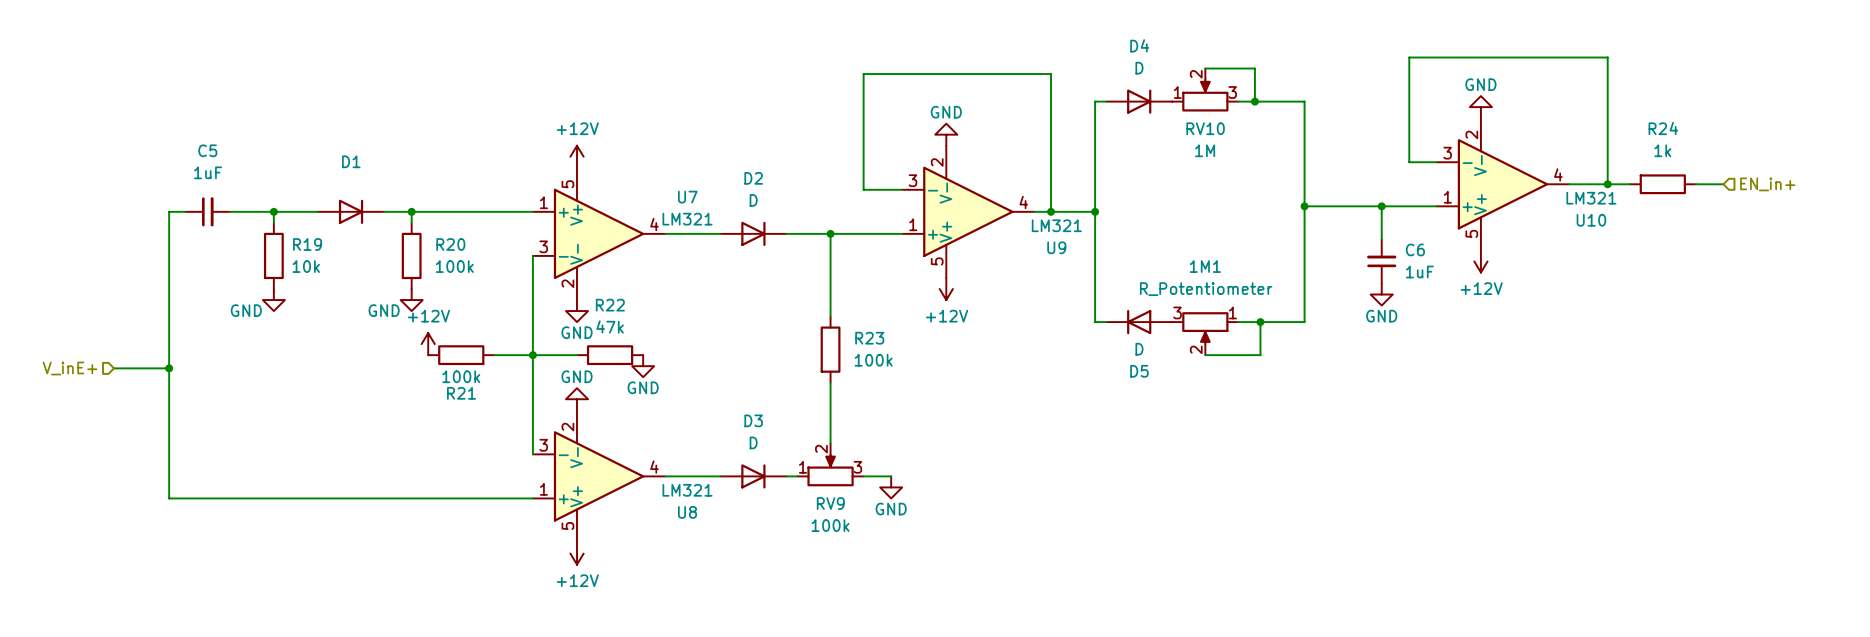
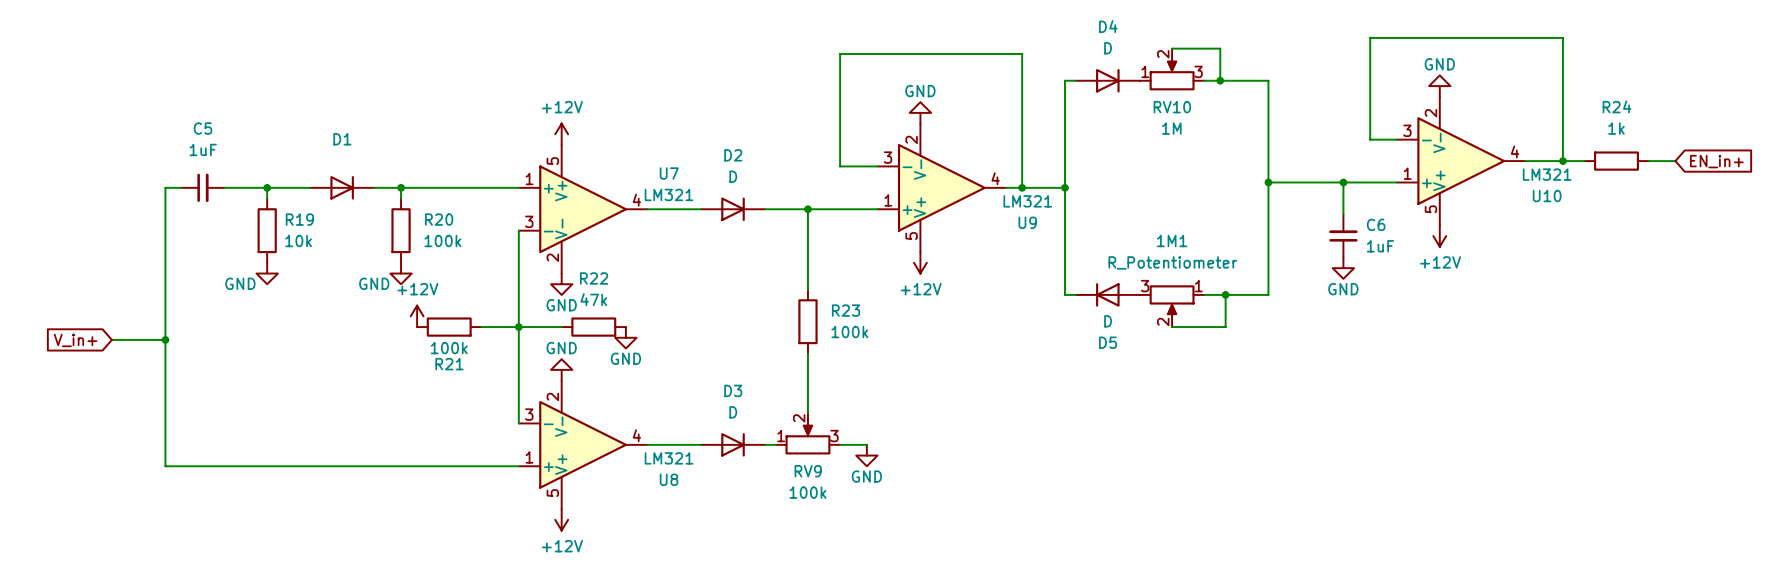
global label: none -> EN_in+ (1716, 161)
hierarchical label: EN_in+ (1767, 184) -> none
hierarchical label: V_inE+ (70, 368) -> none
global label: none -> V_in+ (75, 340)

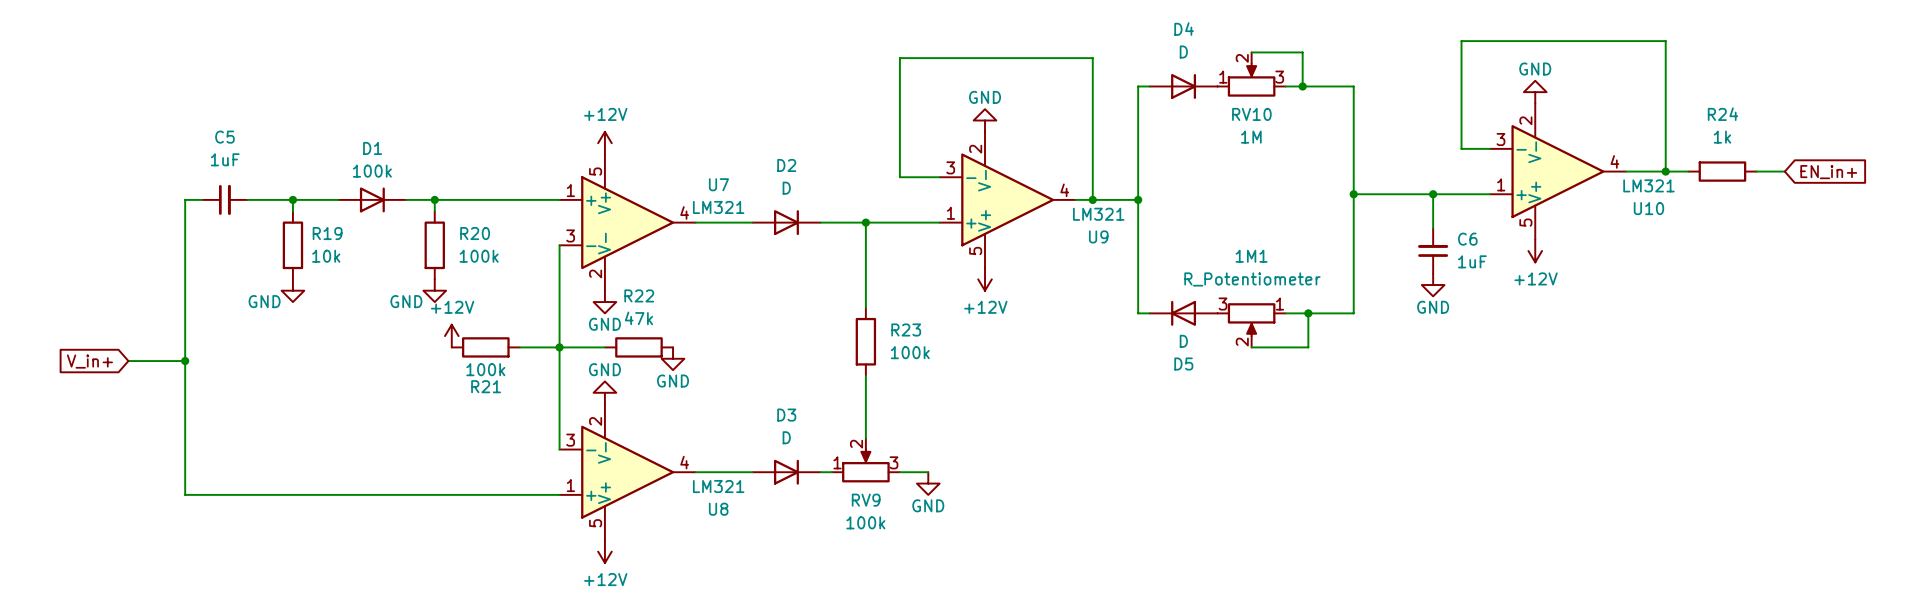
D1 value: none -> 100k (372, 171)

